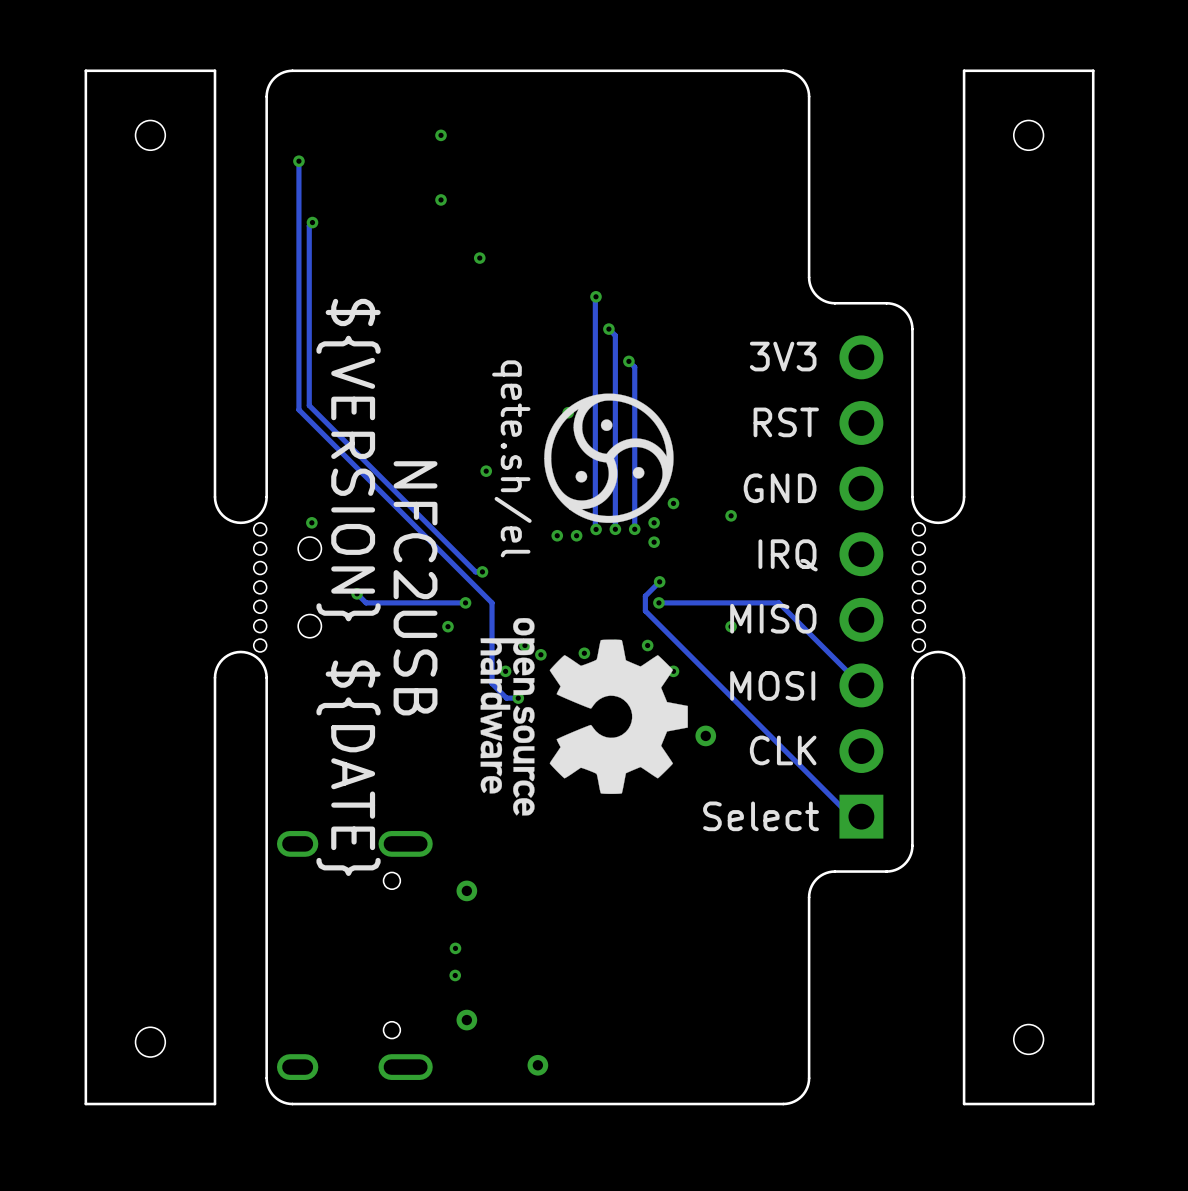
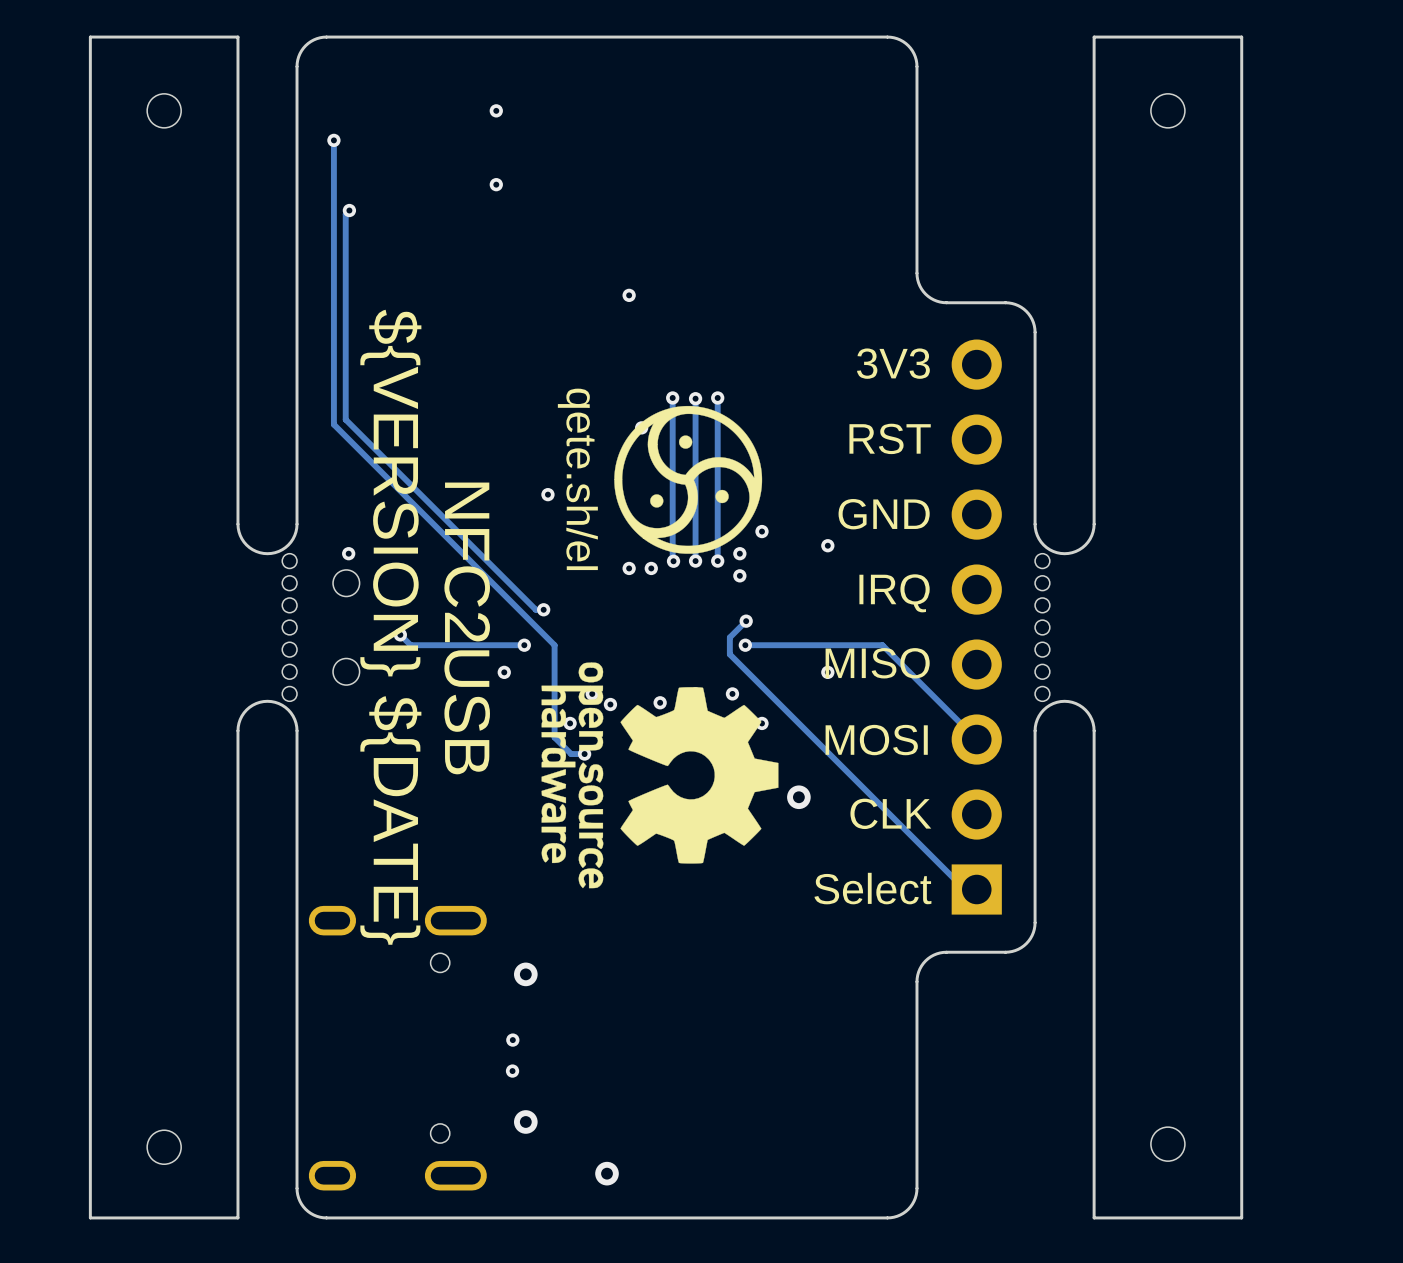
via: (479, 258) -> none
via: none -> (629, 295)
track: (595, 296) (595, 386) -> none
via: (595, 296) -> none
track: (608, 329) (615, 335) (615, 387) -> none
via: (608, 329) -> none
track: (628, 361) (634, 367) (634, 386) -> none
via: (628, 361) -> none
via: none -> (672, 397)
via: none -> (717, 397)
via: none -> (695, 398)

